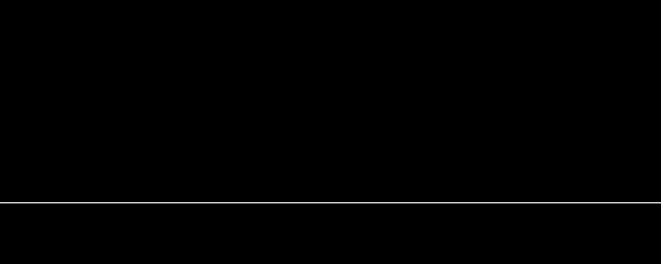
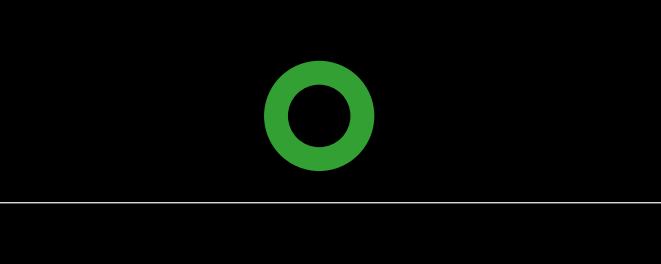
part: none -> (319, 115)

